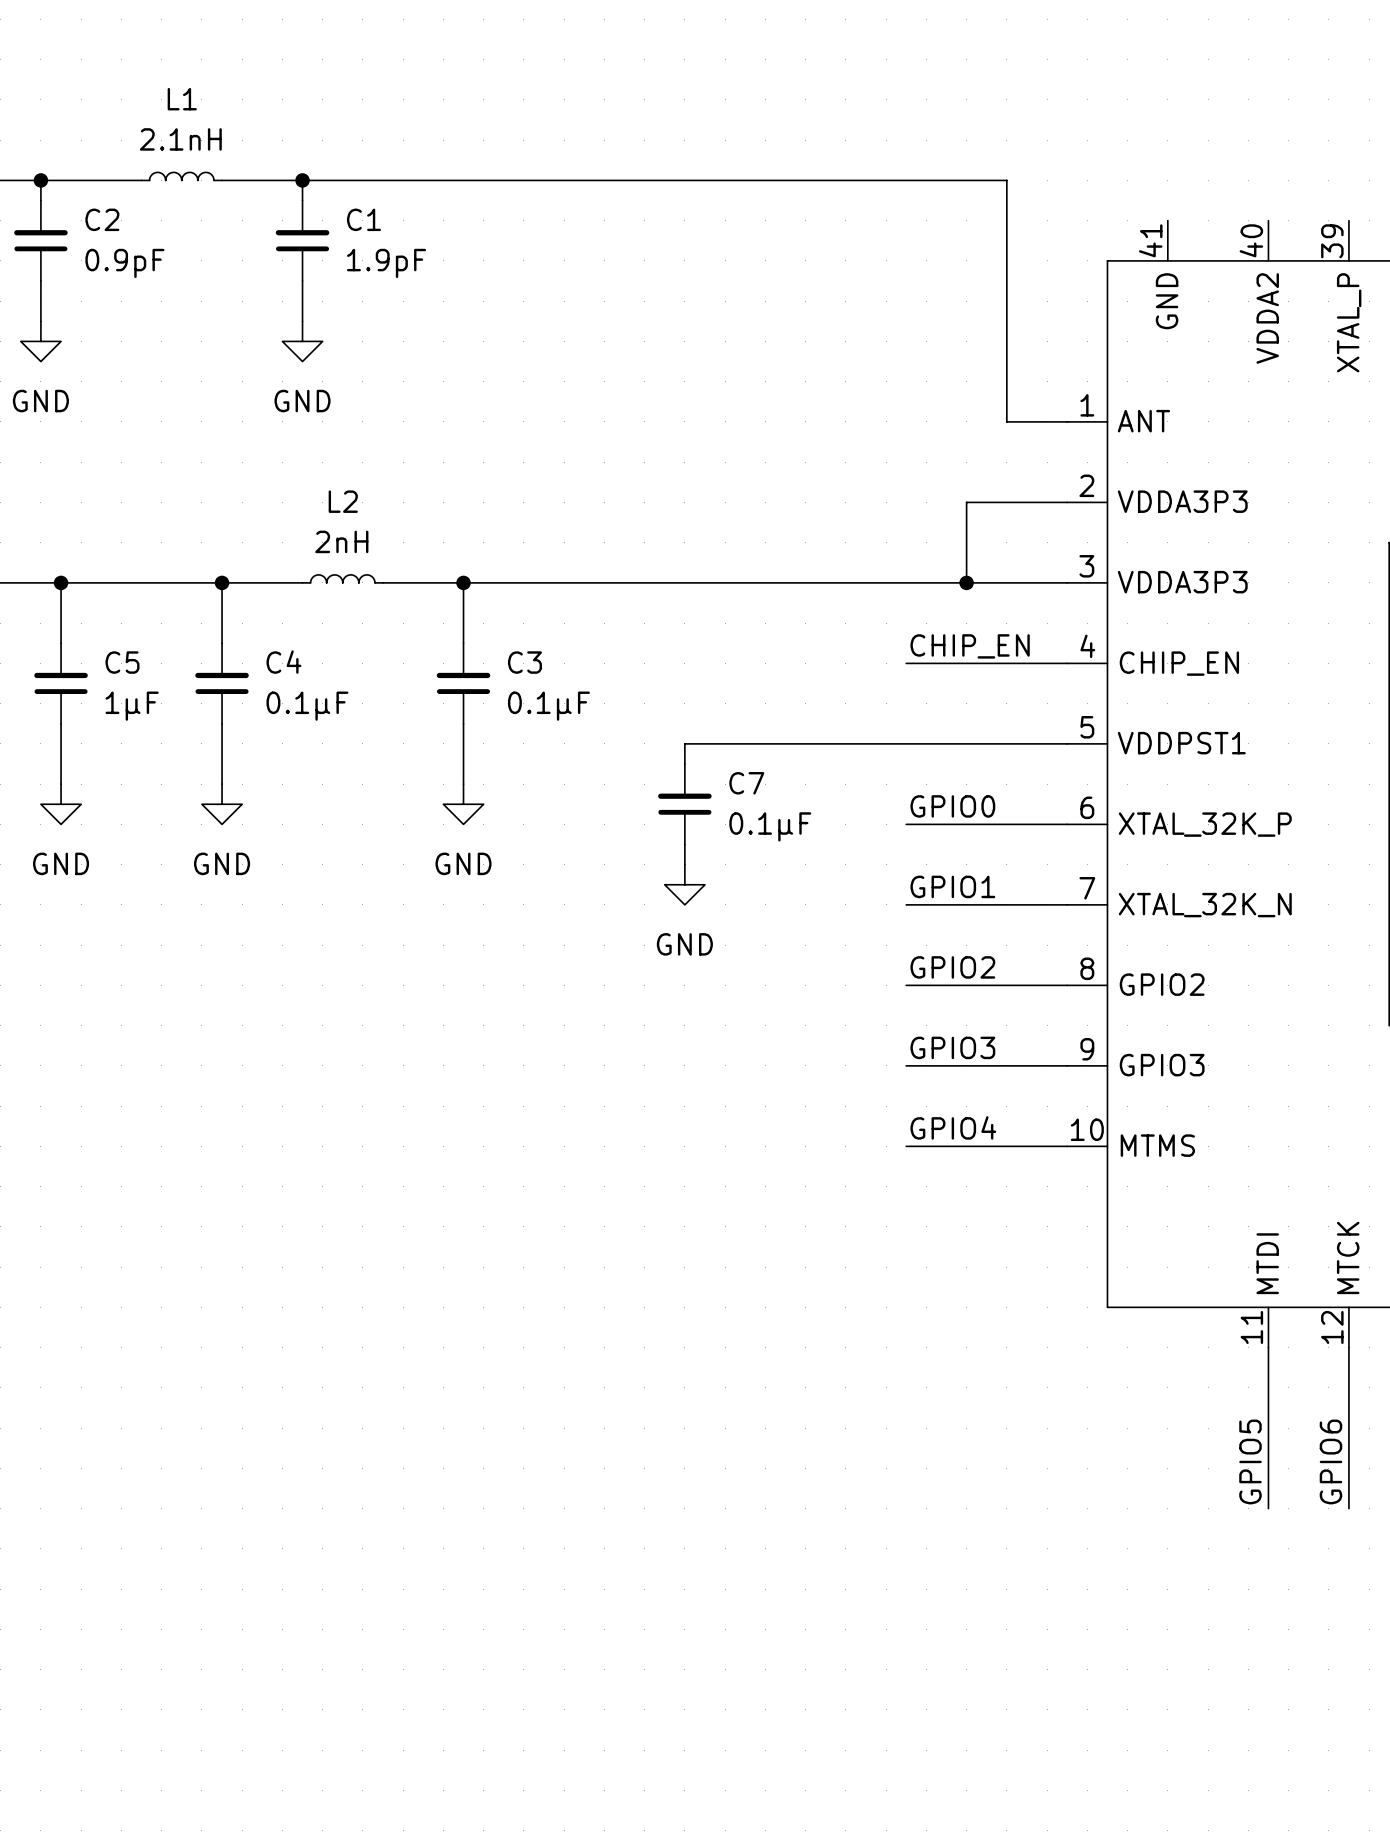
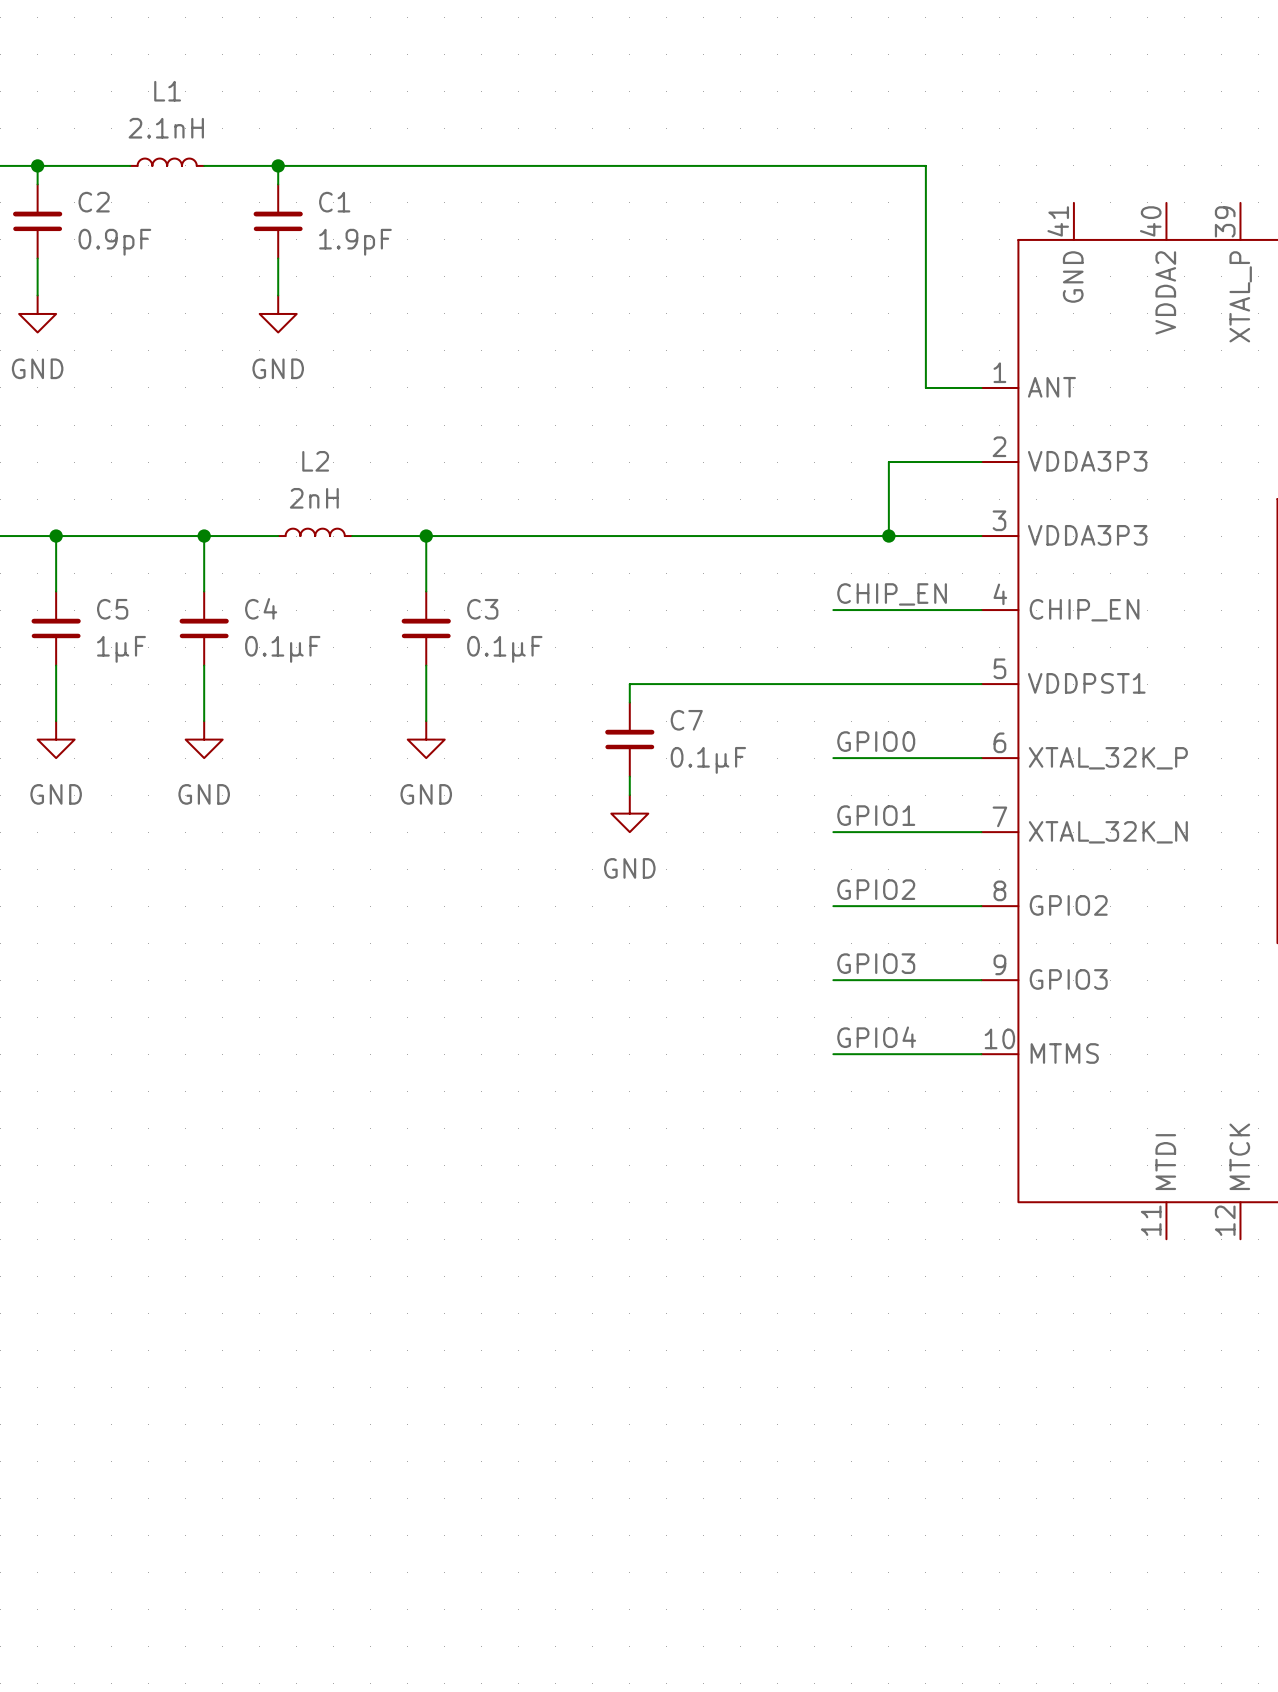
wire: (1268, 1347) (1268, 1508) -> none
wire: (1348, 1347) (1348, 1508) -> none
label: GPIO5 (1250, 1461) -> none
label: GPIO6 (1330, 1461) -> none

